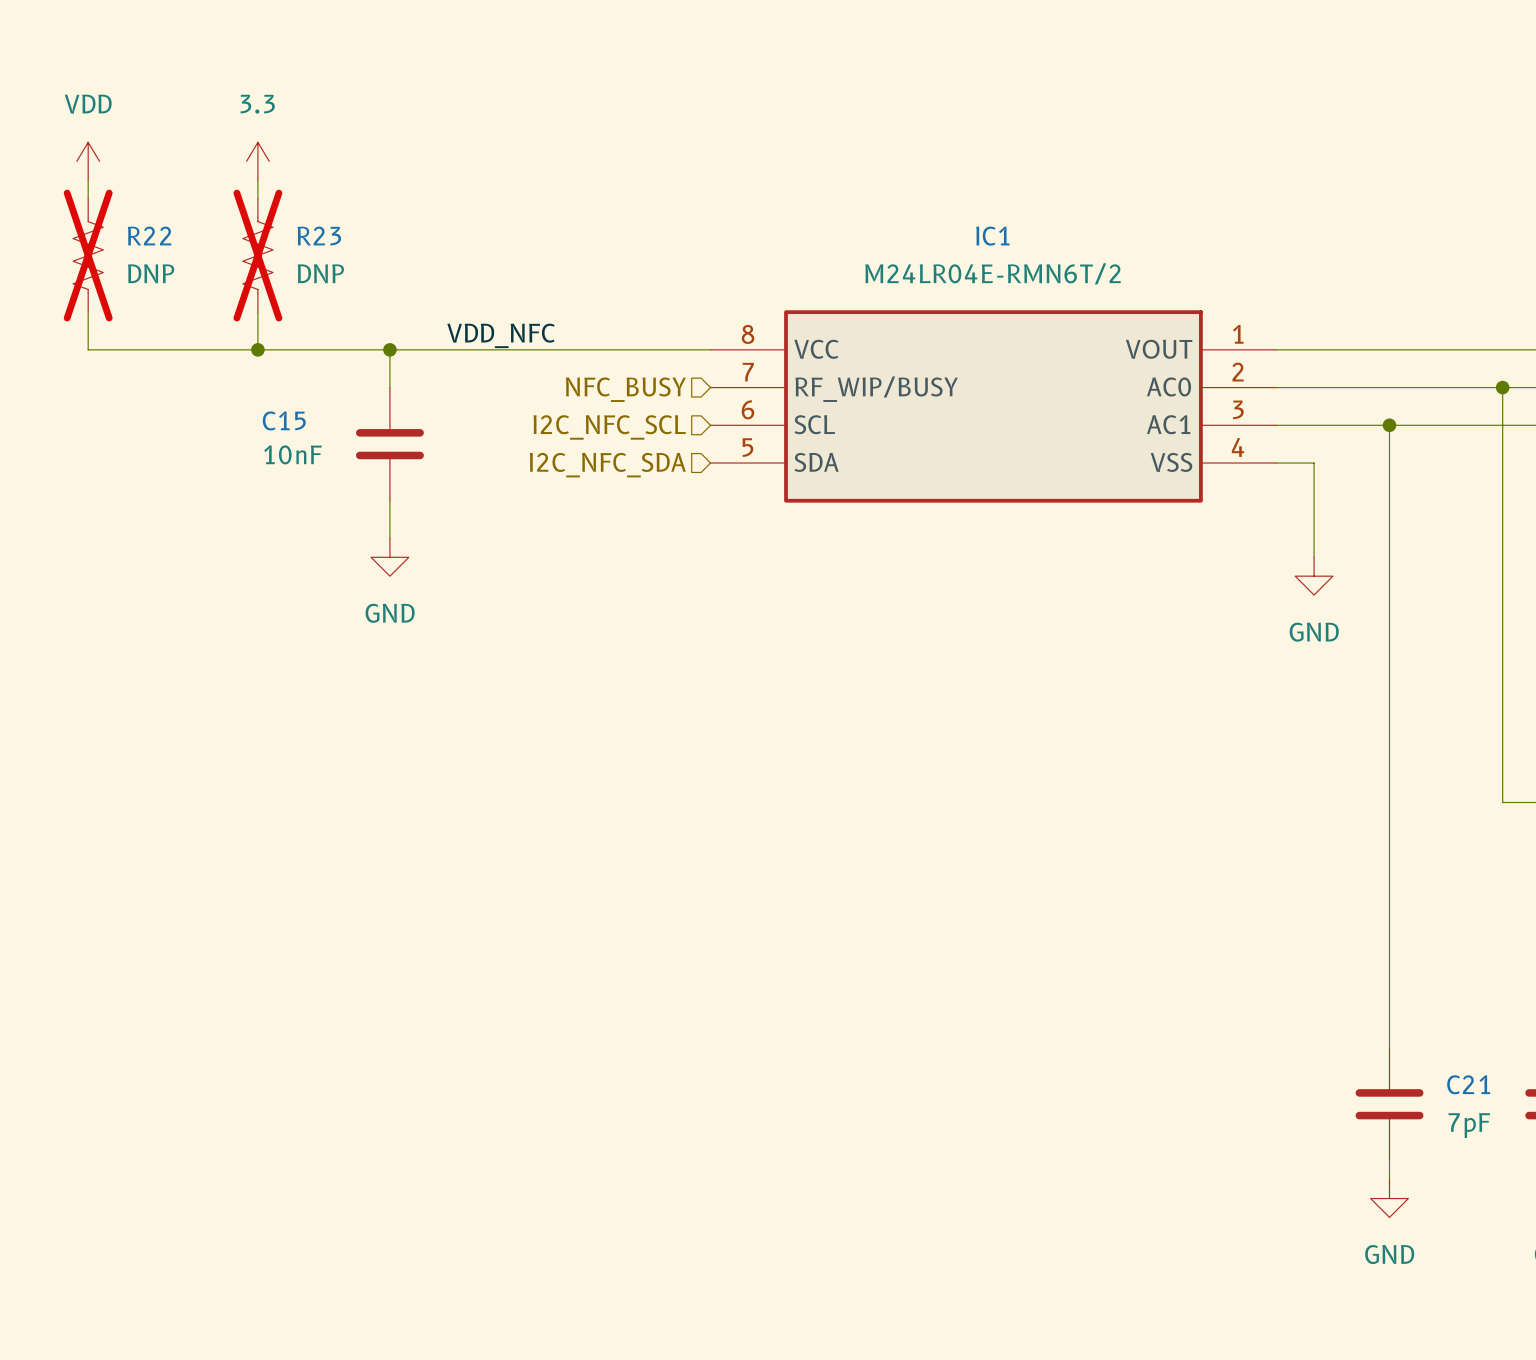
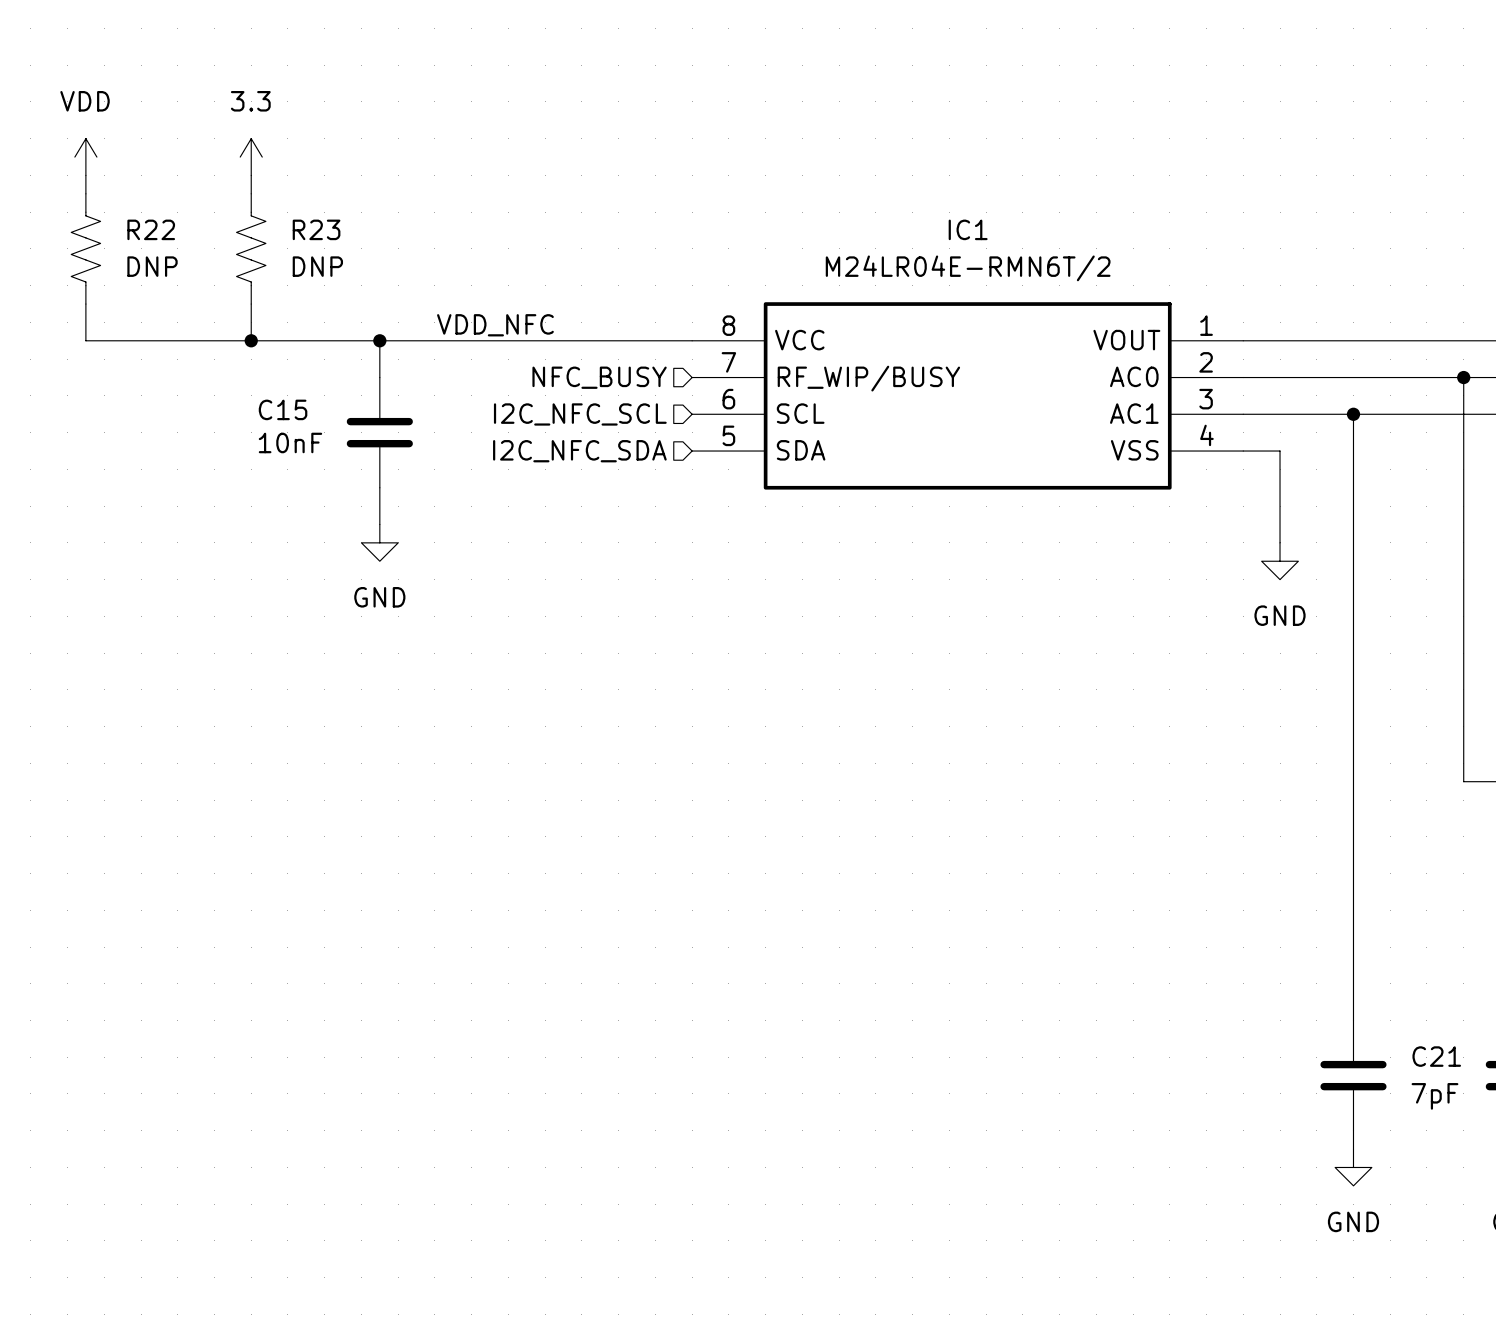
R22 do-not-place cross: (88, 255) -> none
R23 do-not-place cross: (257, 255) -> none

